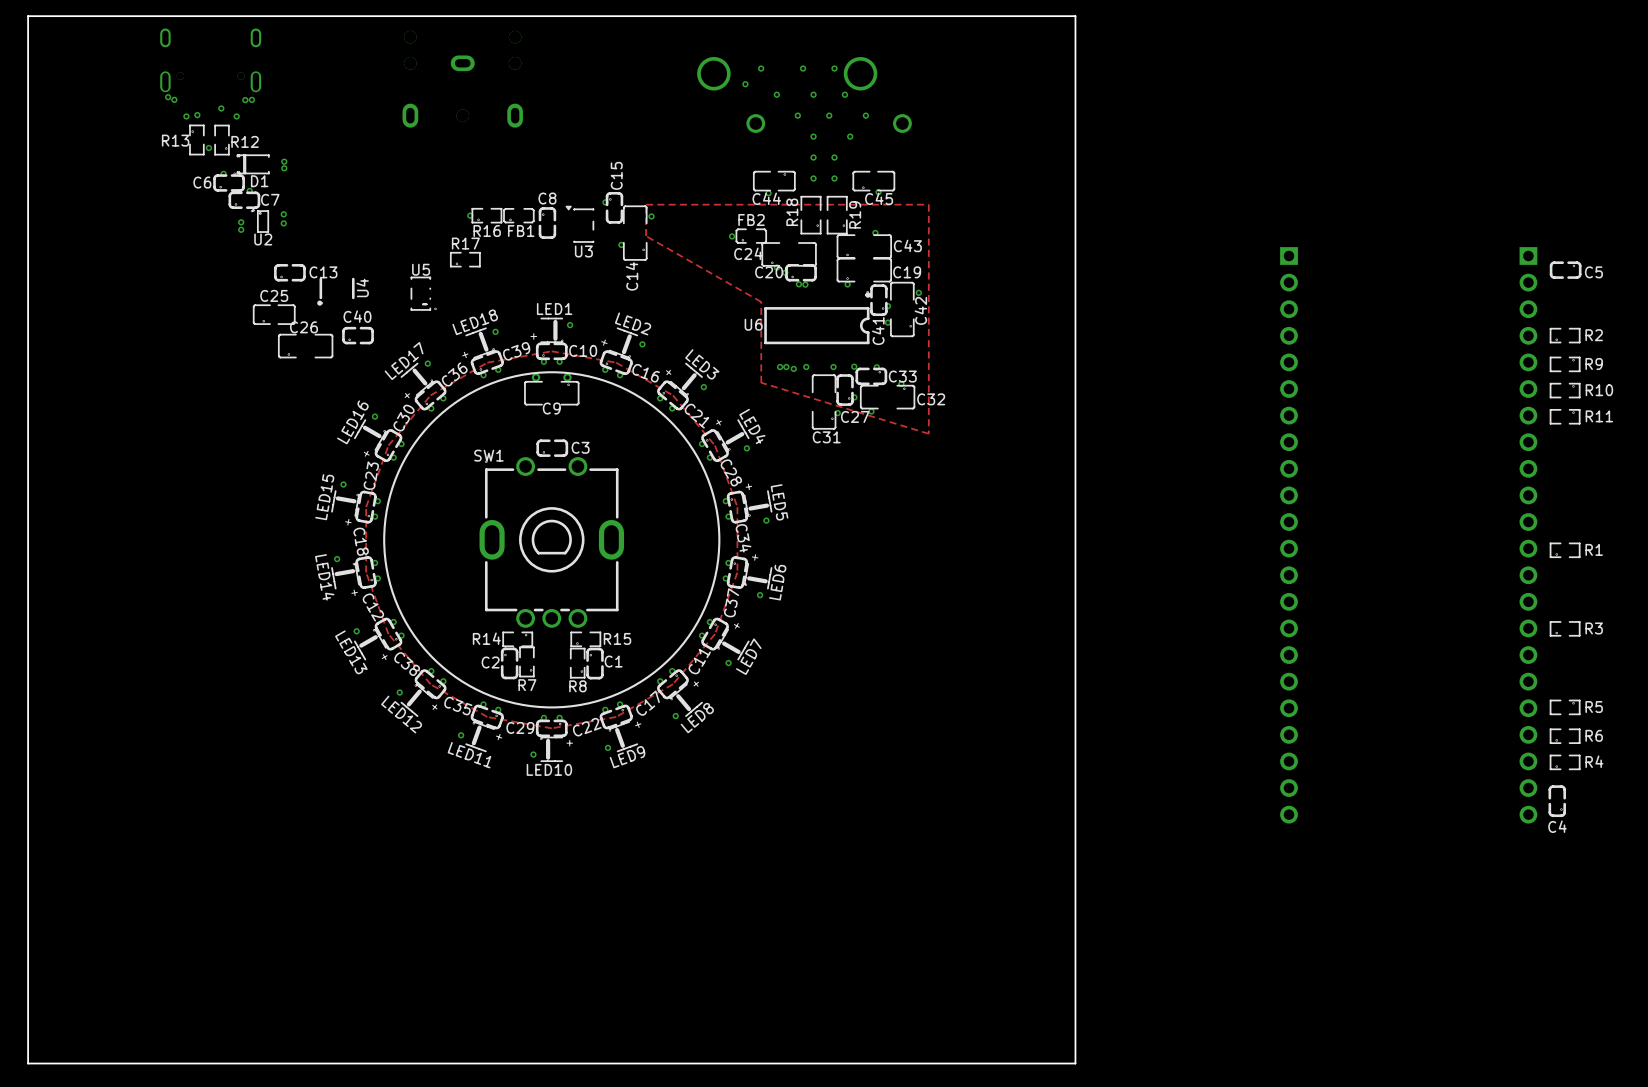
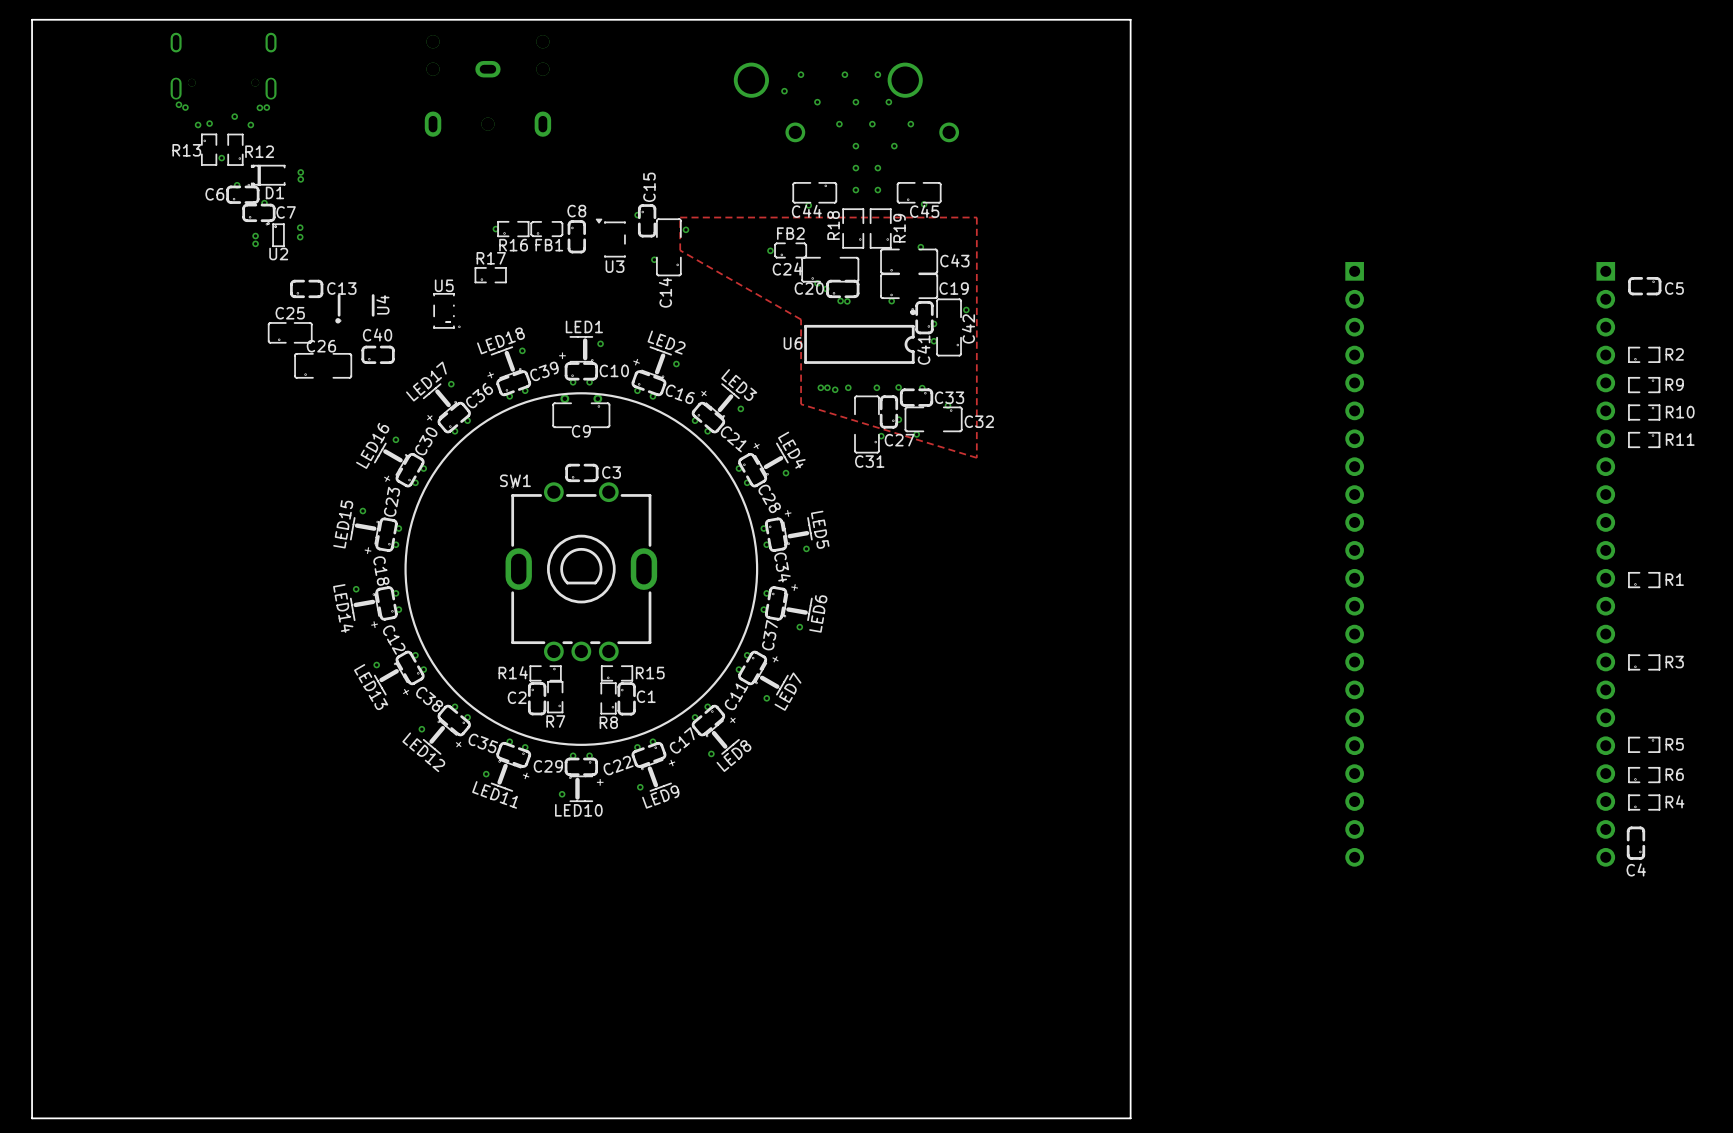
zone outline: (551, 351) (616, 362) (672, 395) (715, 445) (737, 507) (737, 572) (715, 634) (672, 684) (616, 716) (551, 728) (487, 716) (430, 684) (388, 634) (366, 572) (366, 507) (388, 445) (430, 395) (487, 362) (551, 351) -> none

